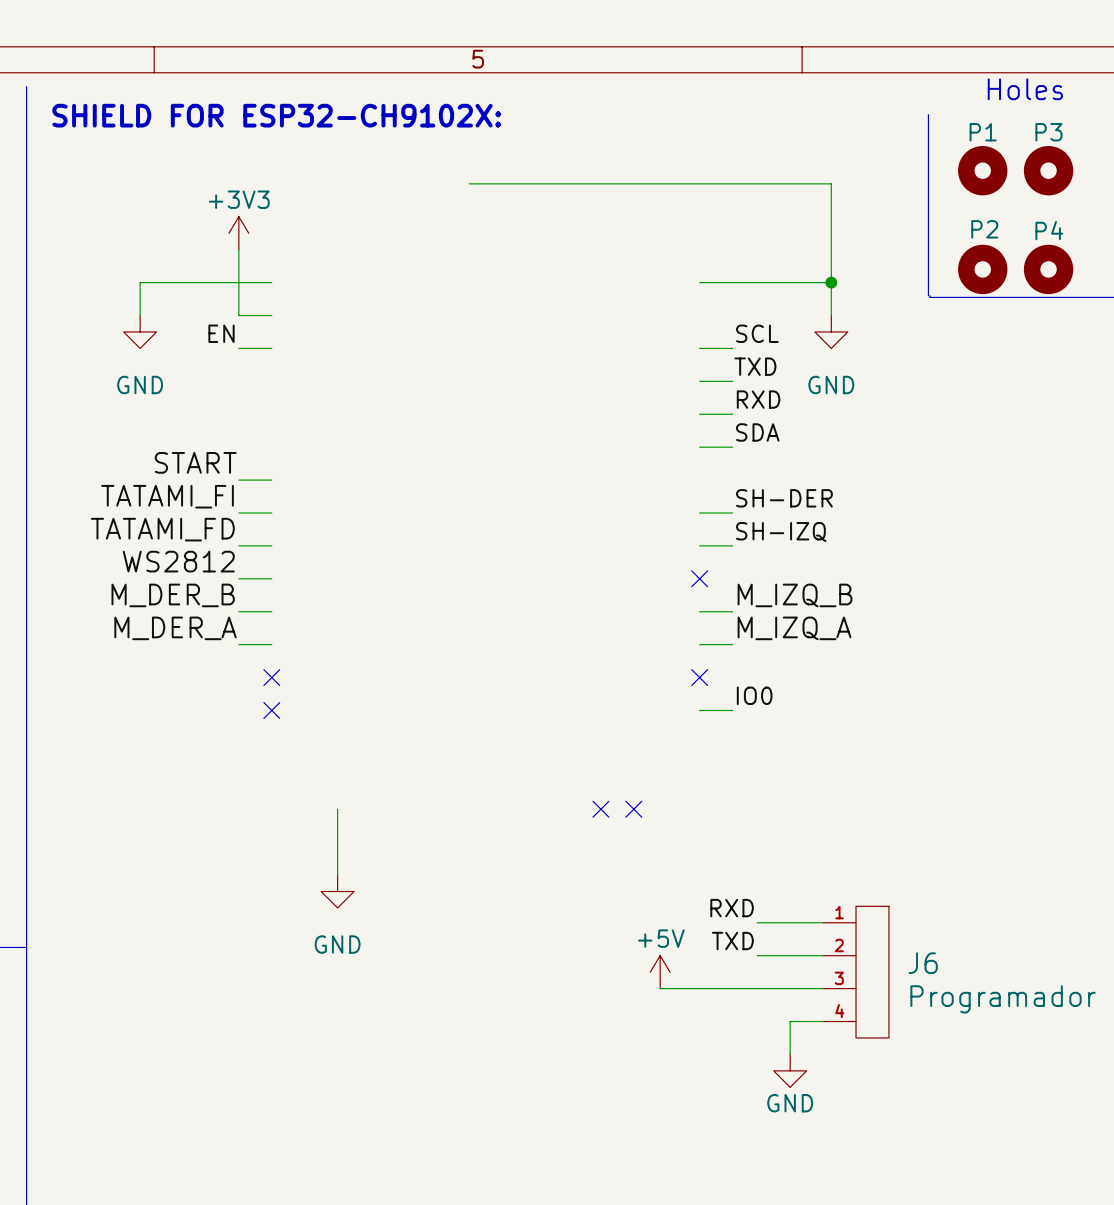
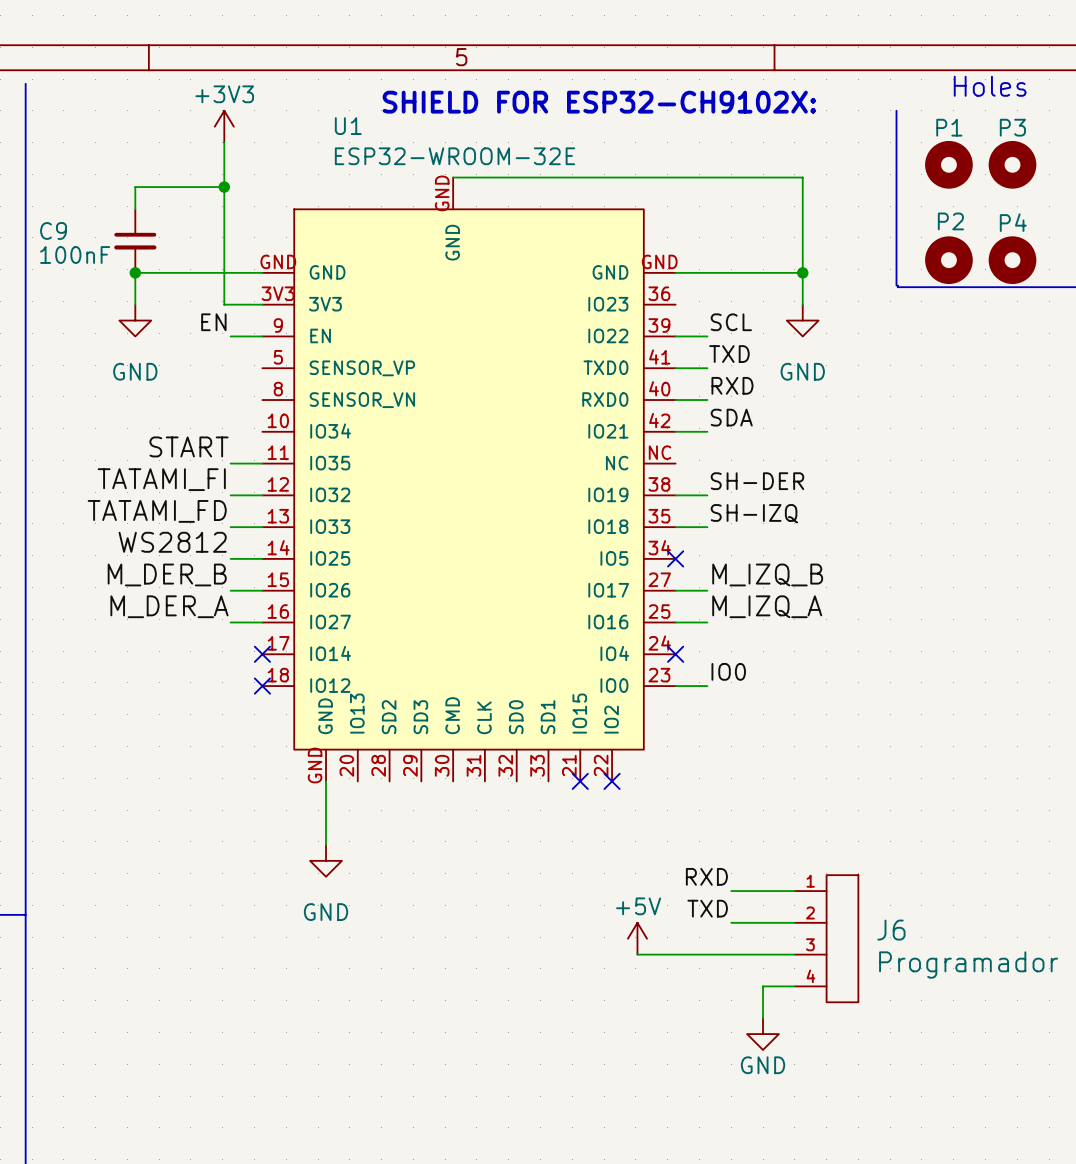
text: none -> SHIELD FOR ESP32-CH9102X: (599, 102)
text: SHIELD FOR ESP32-CH9102X: (276, 115) -> none
wire: none -> (224, 187) (135, 187) (135, 209)
junction: none -> (224, 187)
power symbol position: +3V3 (238, 233) -> +3V3 (224, 126)
C9: none -> 100nF (135, 241)
wire: (238, 249) (238, 315) -> (224, 142) (224, 304) (230, 304)
junction: none -> (135, 272)
U1: none -> ESP32-WROOM-32E (469, 479)

